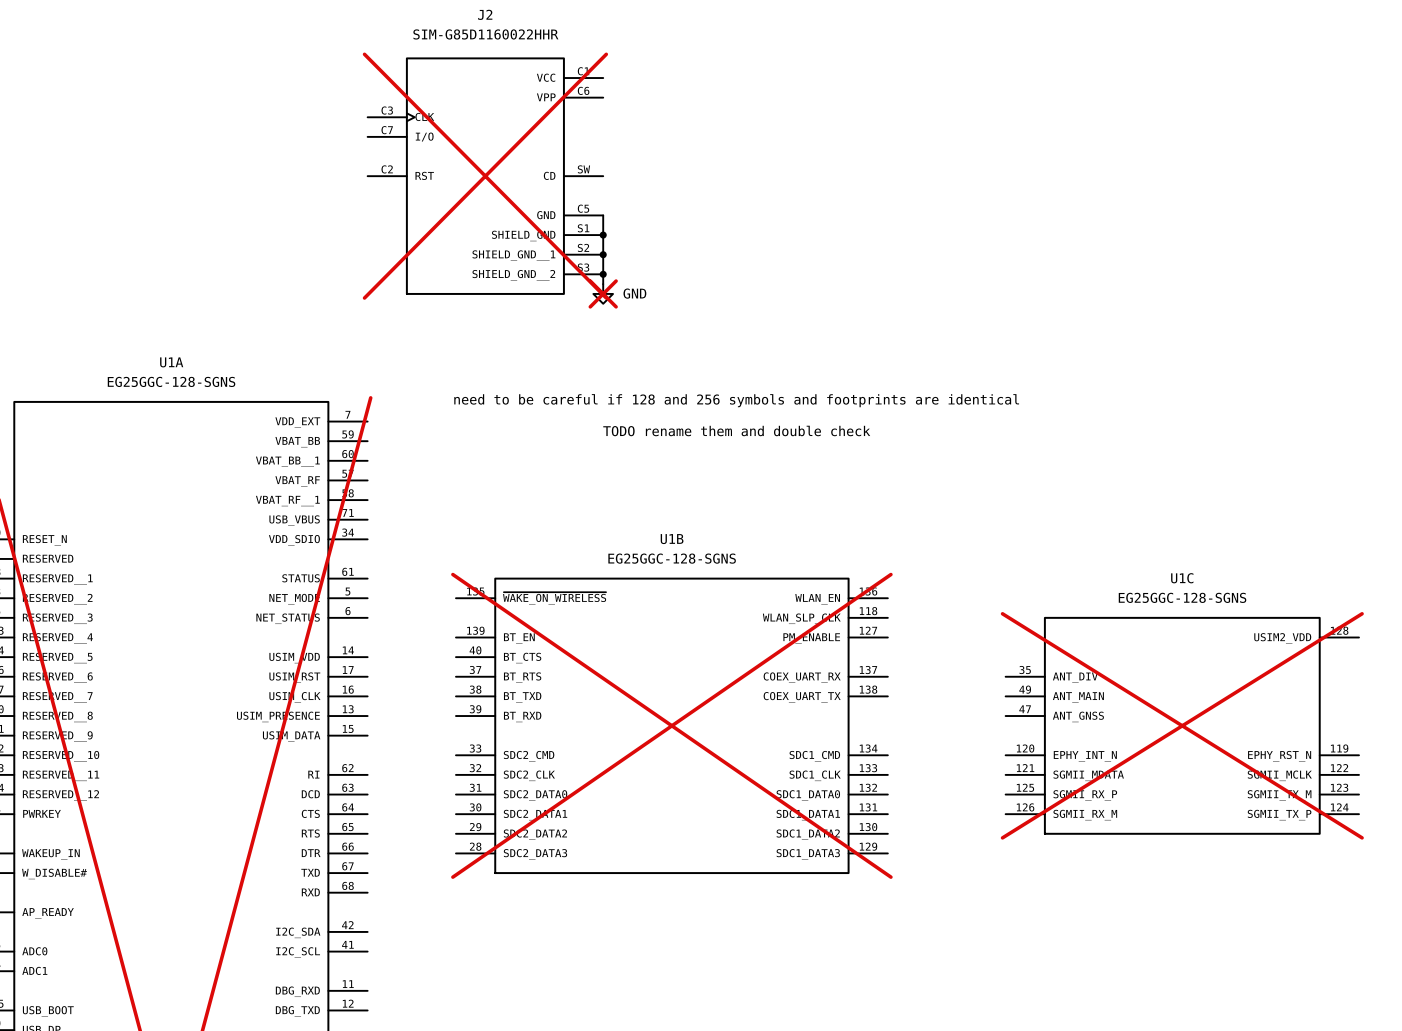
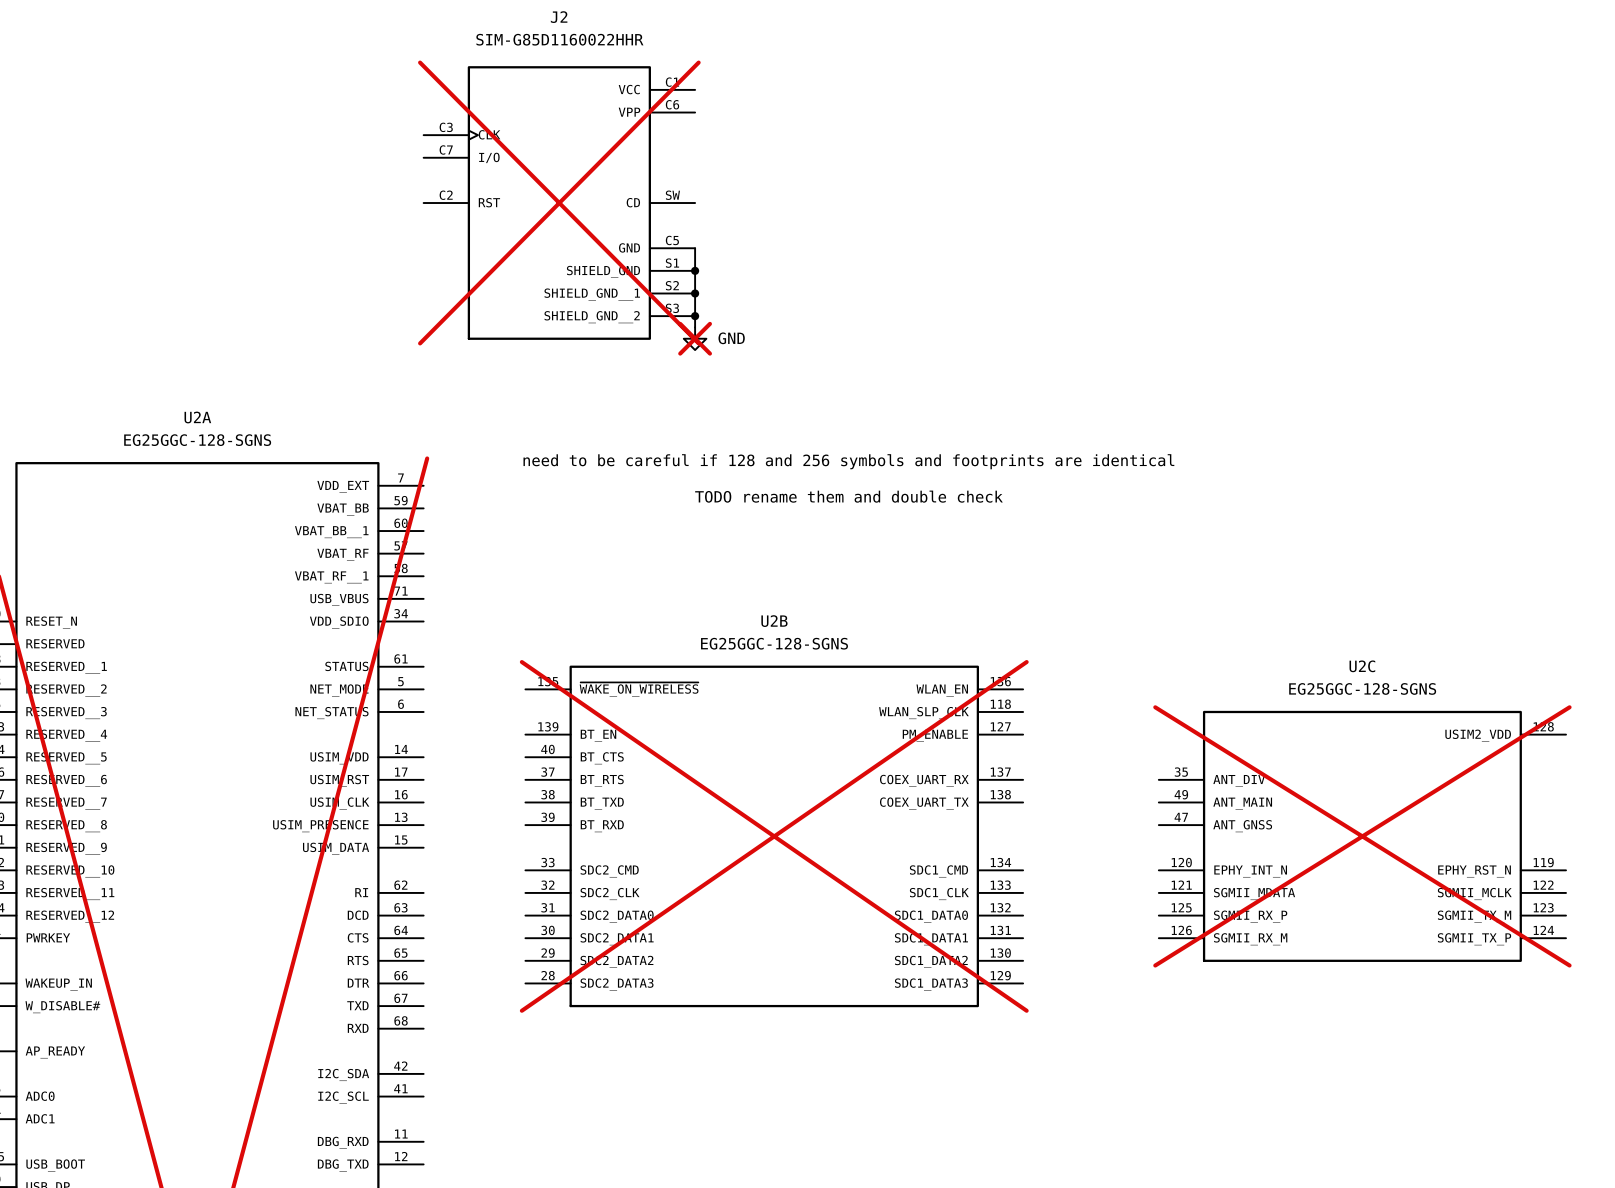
U1A name: U1A (171, 362) -> U2A (197, 417)
U1B name: U1B (672, 539) -> U2B (774, 621)
U1C name: U1C (1182, 578) -> U2C (1362, 666)

